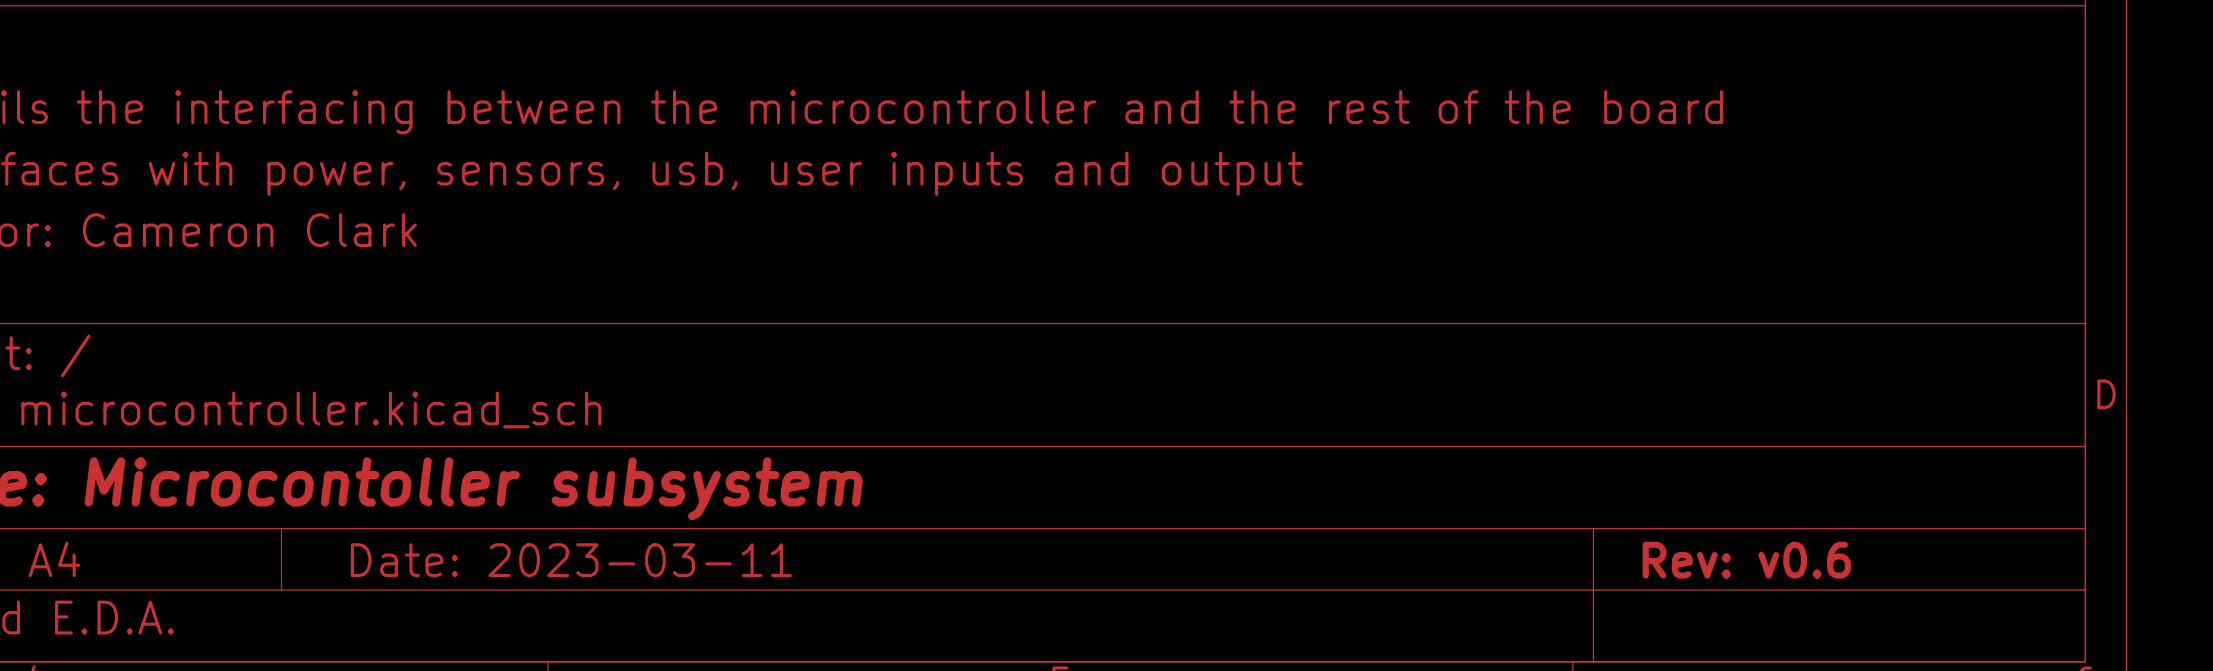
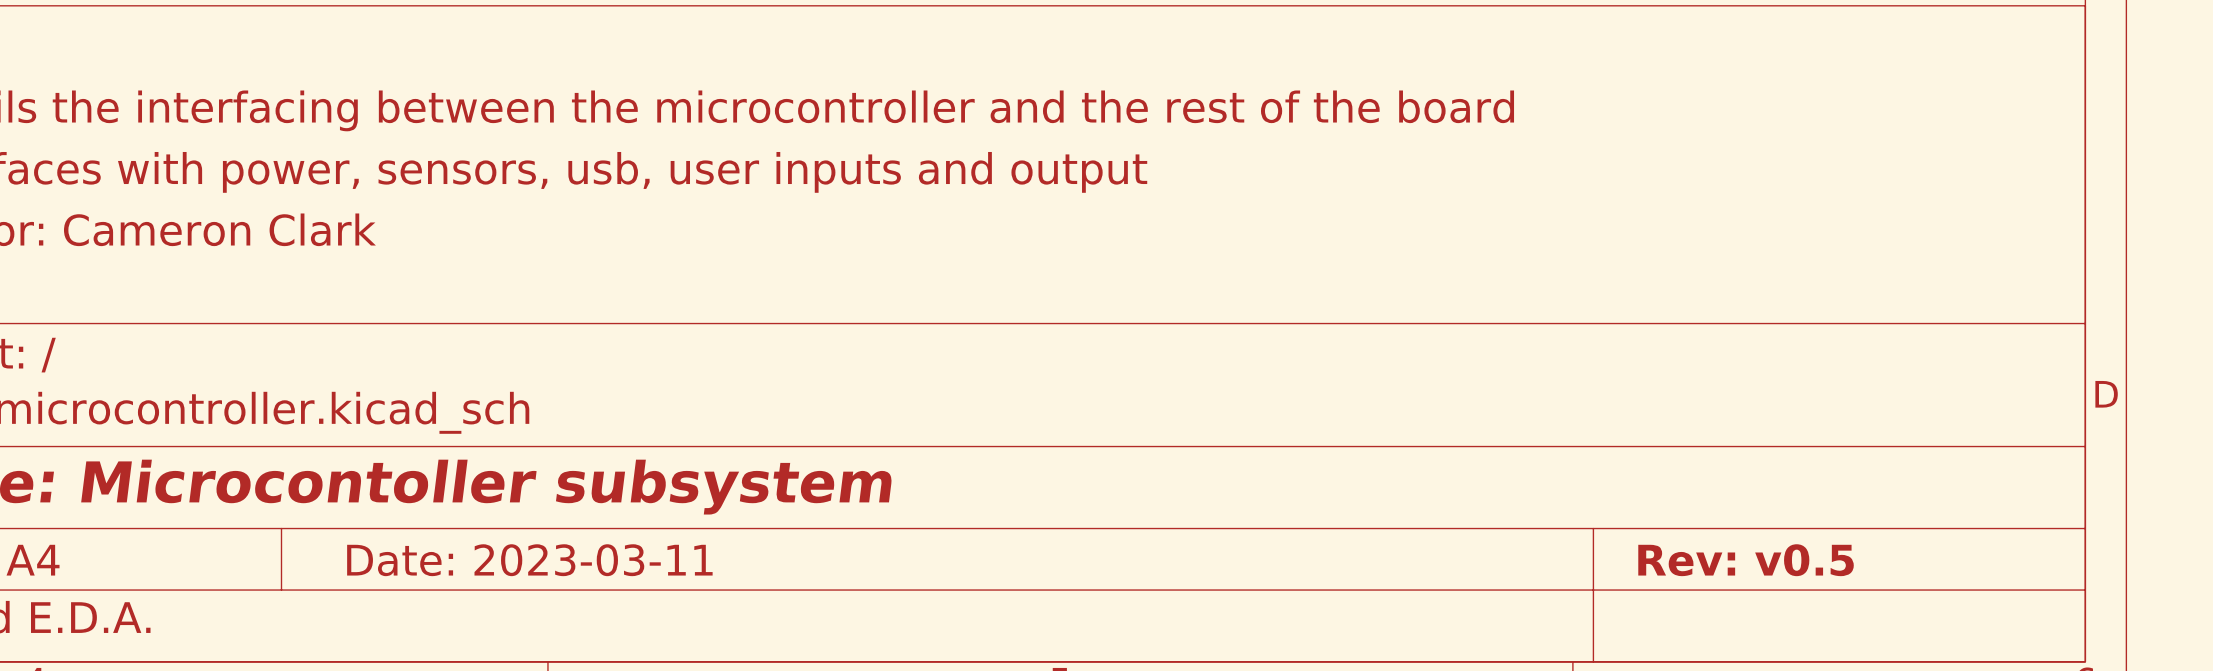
title block: Rev: v0.6 (1746, 560) -> Rev: v0.5 (1746, 560)

